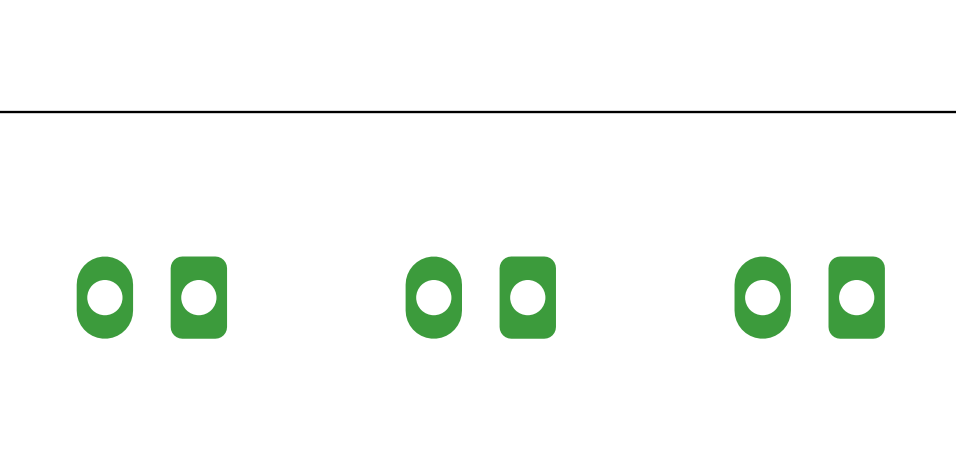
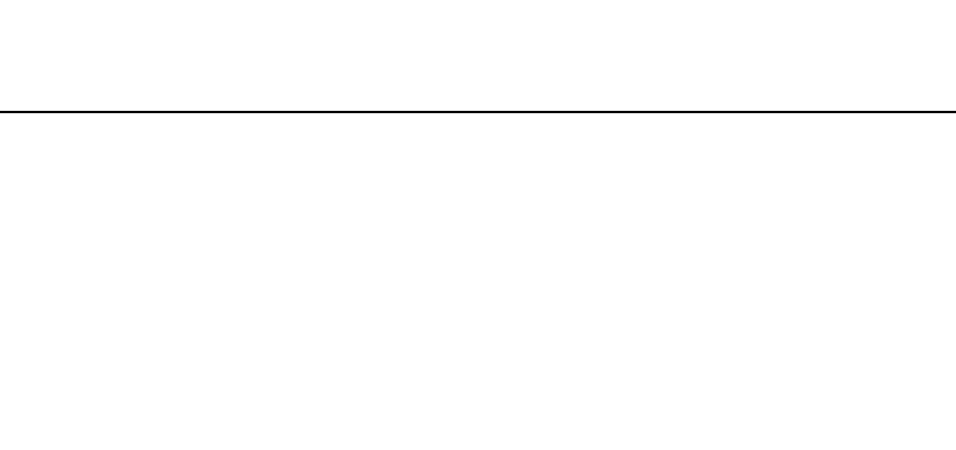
part: (151, 297) -> none
part: (480, 297) -> none
part: (809, 297) -> none

